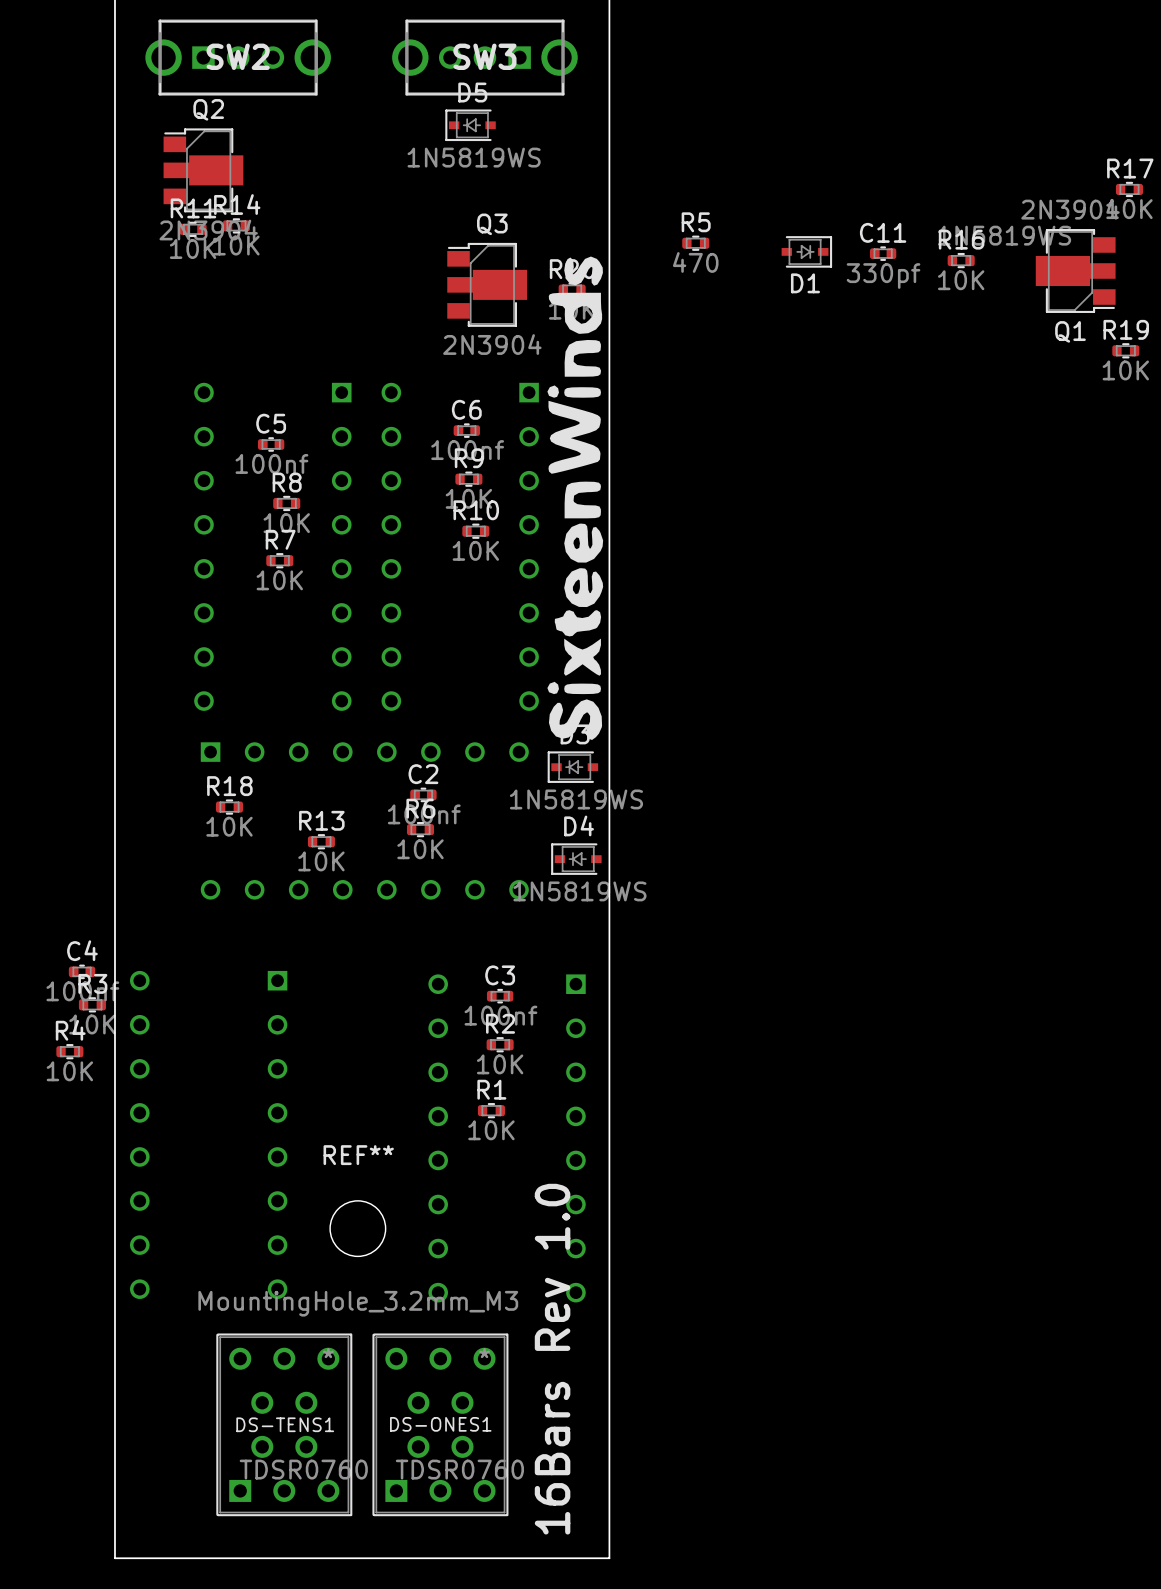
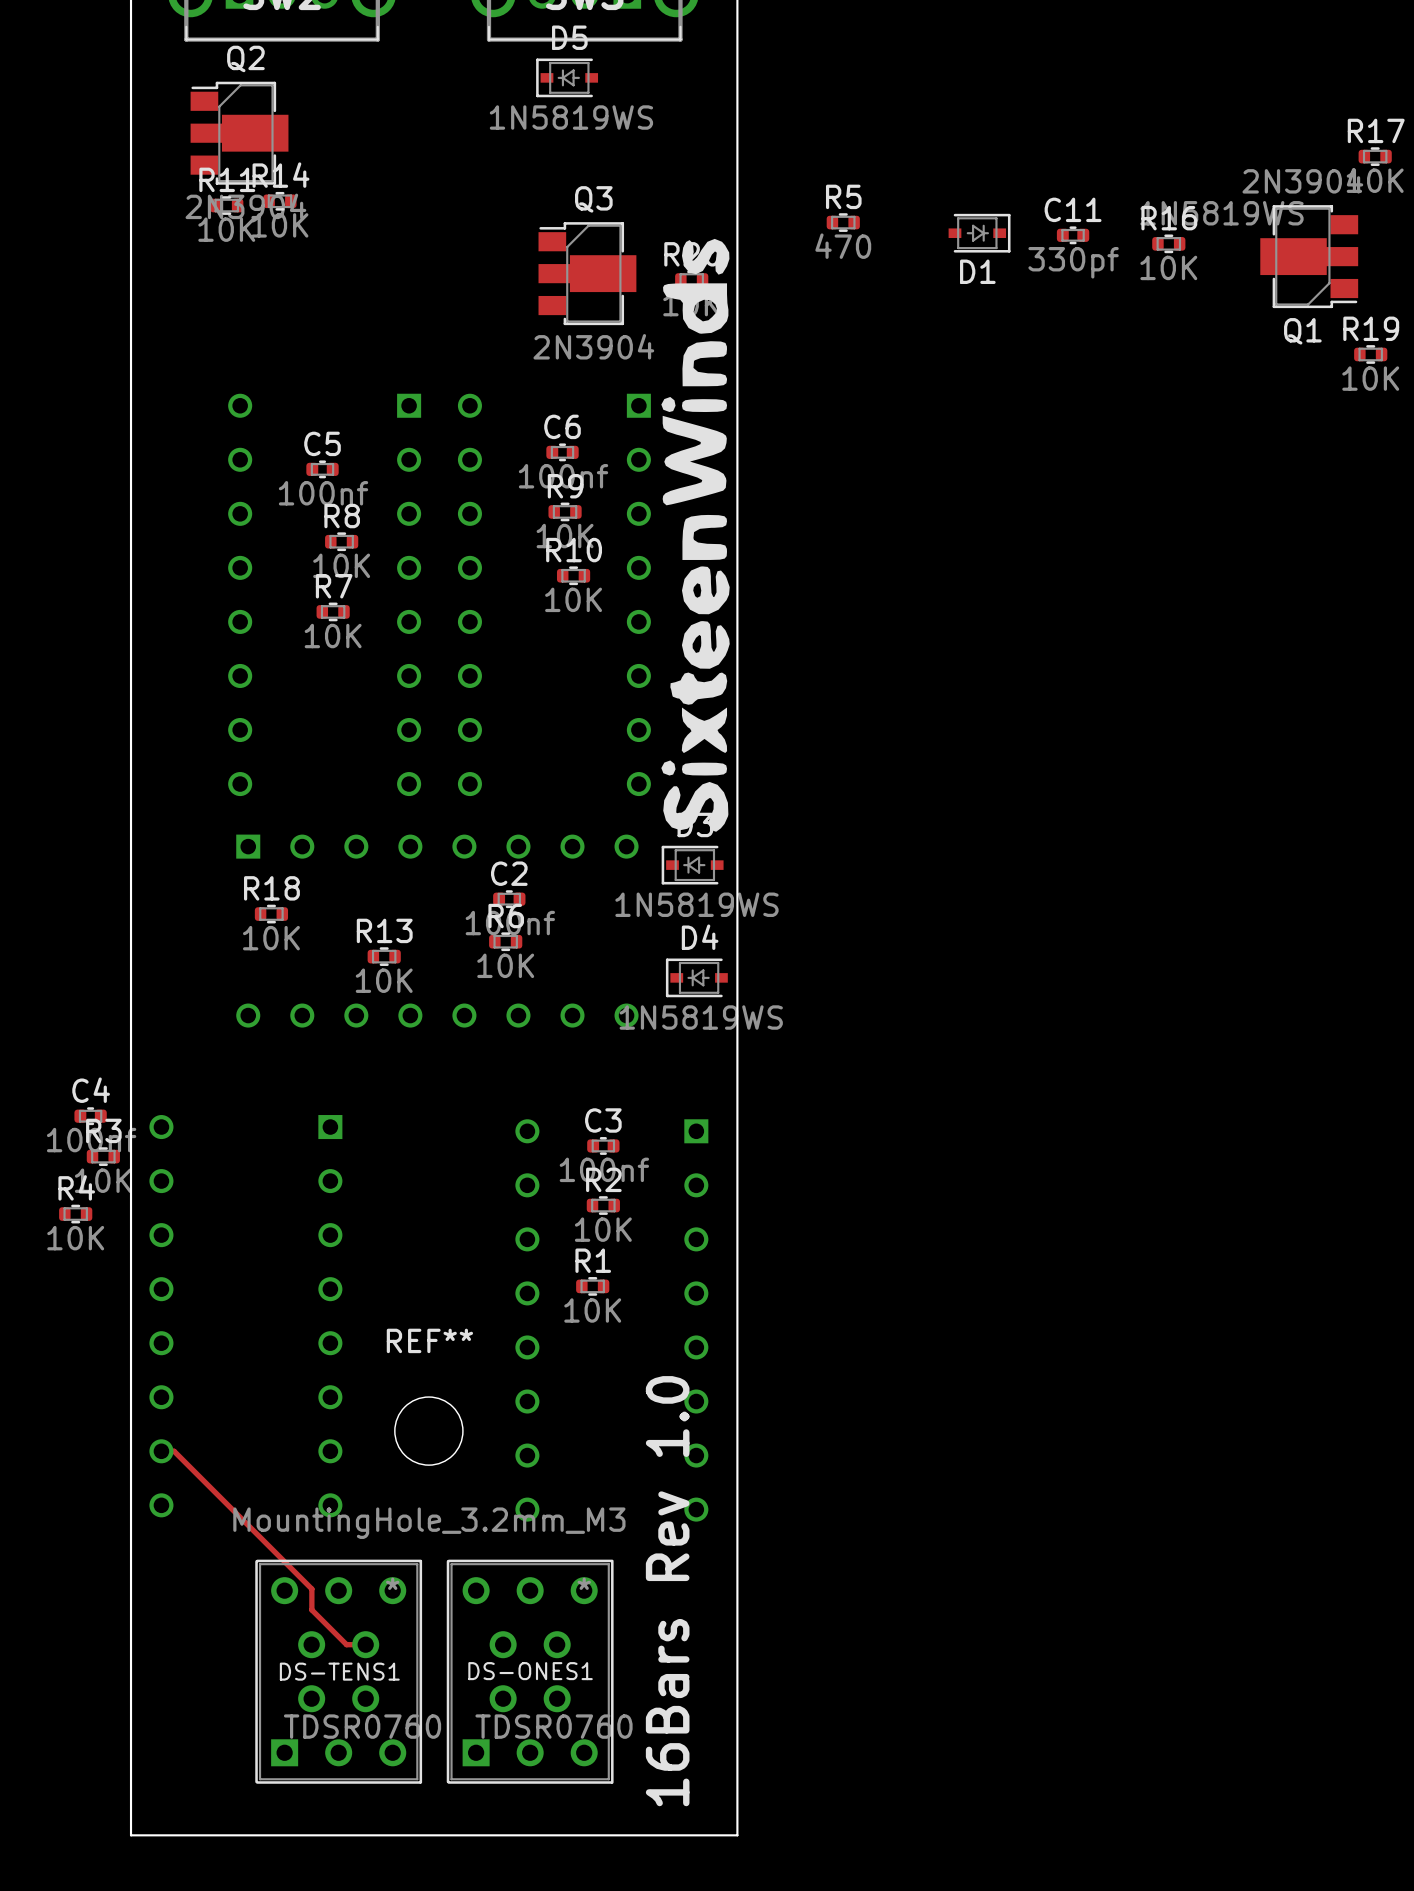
track: none -> (161, 1451) (174, 1451) (311, 1589) (311, 1609) (346, 1644) (365, 1644)

